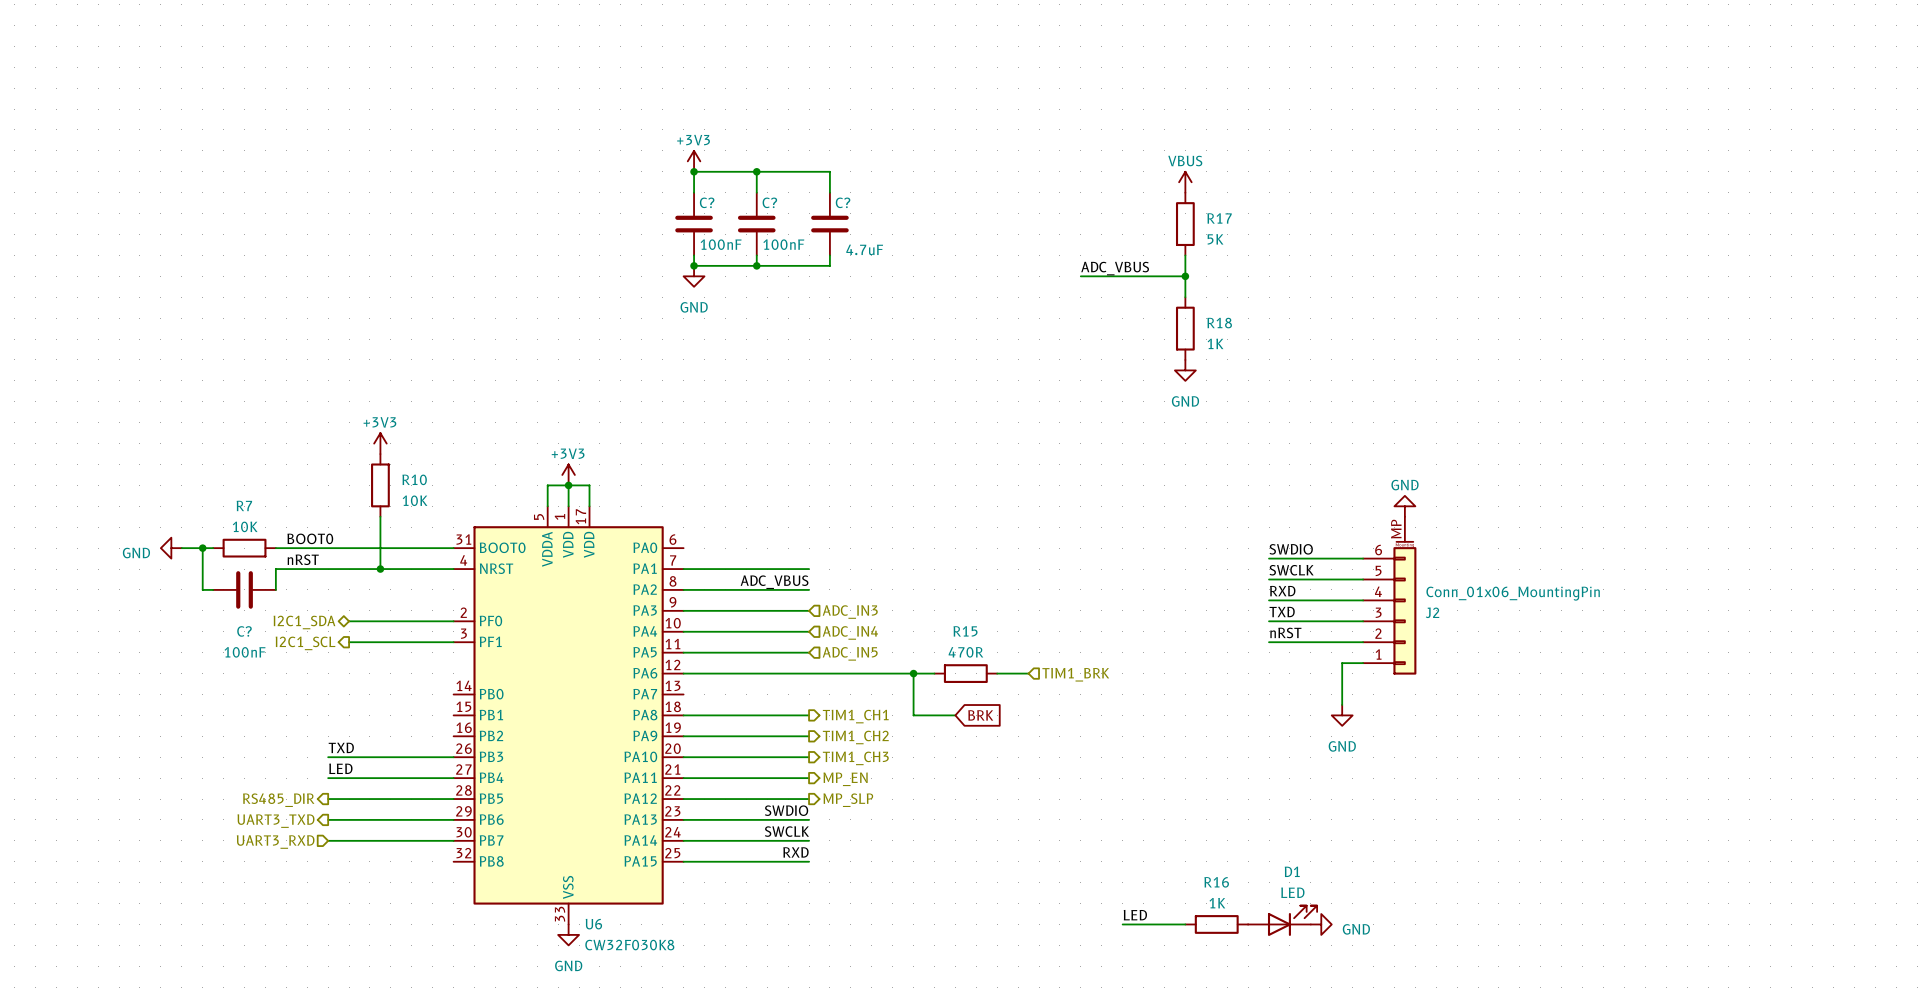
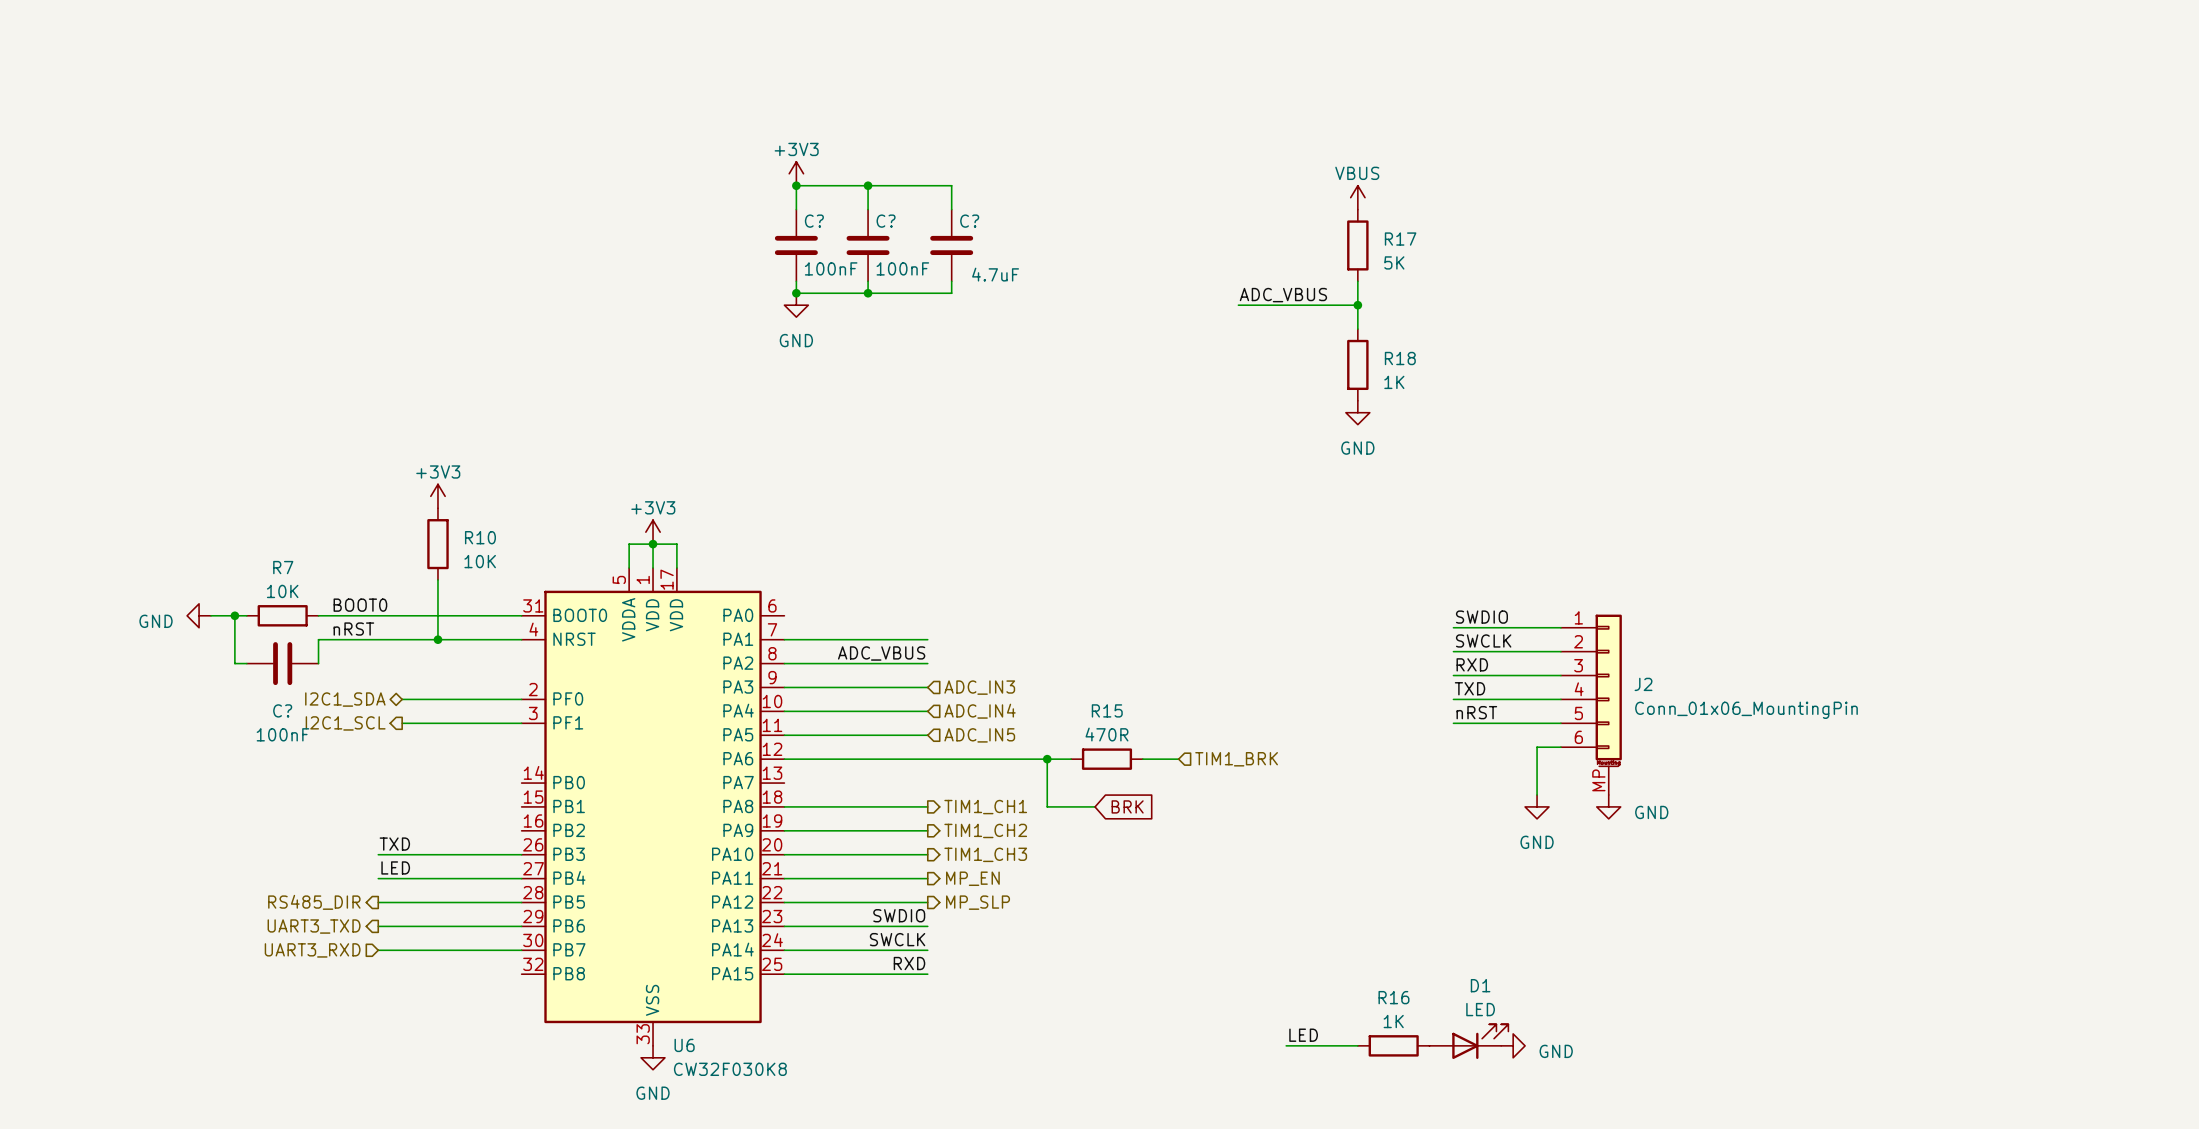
power symbol: GND (1404, 506) -> none
J2 flip: as is (1404, 607) -> up-down (1608, 690)
power symbol: none -> GND (1608, 806)

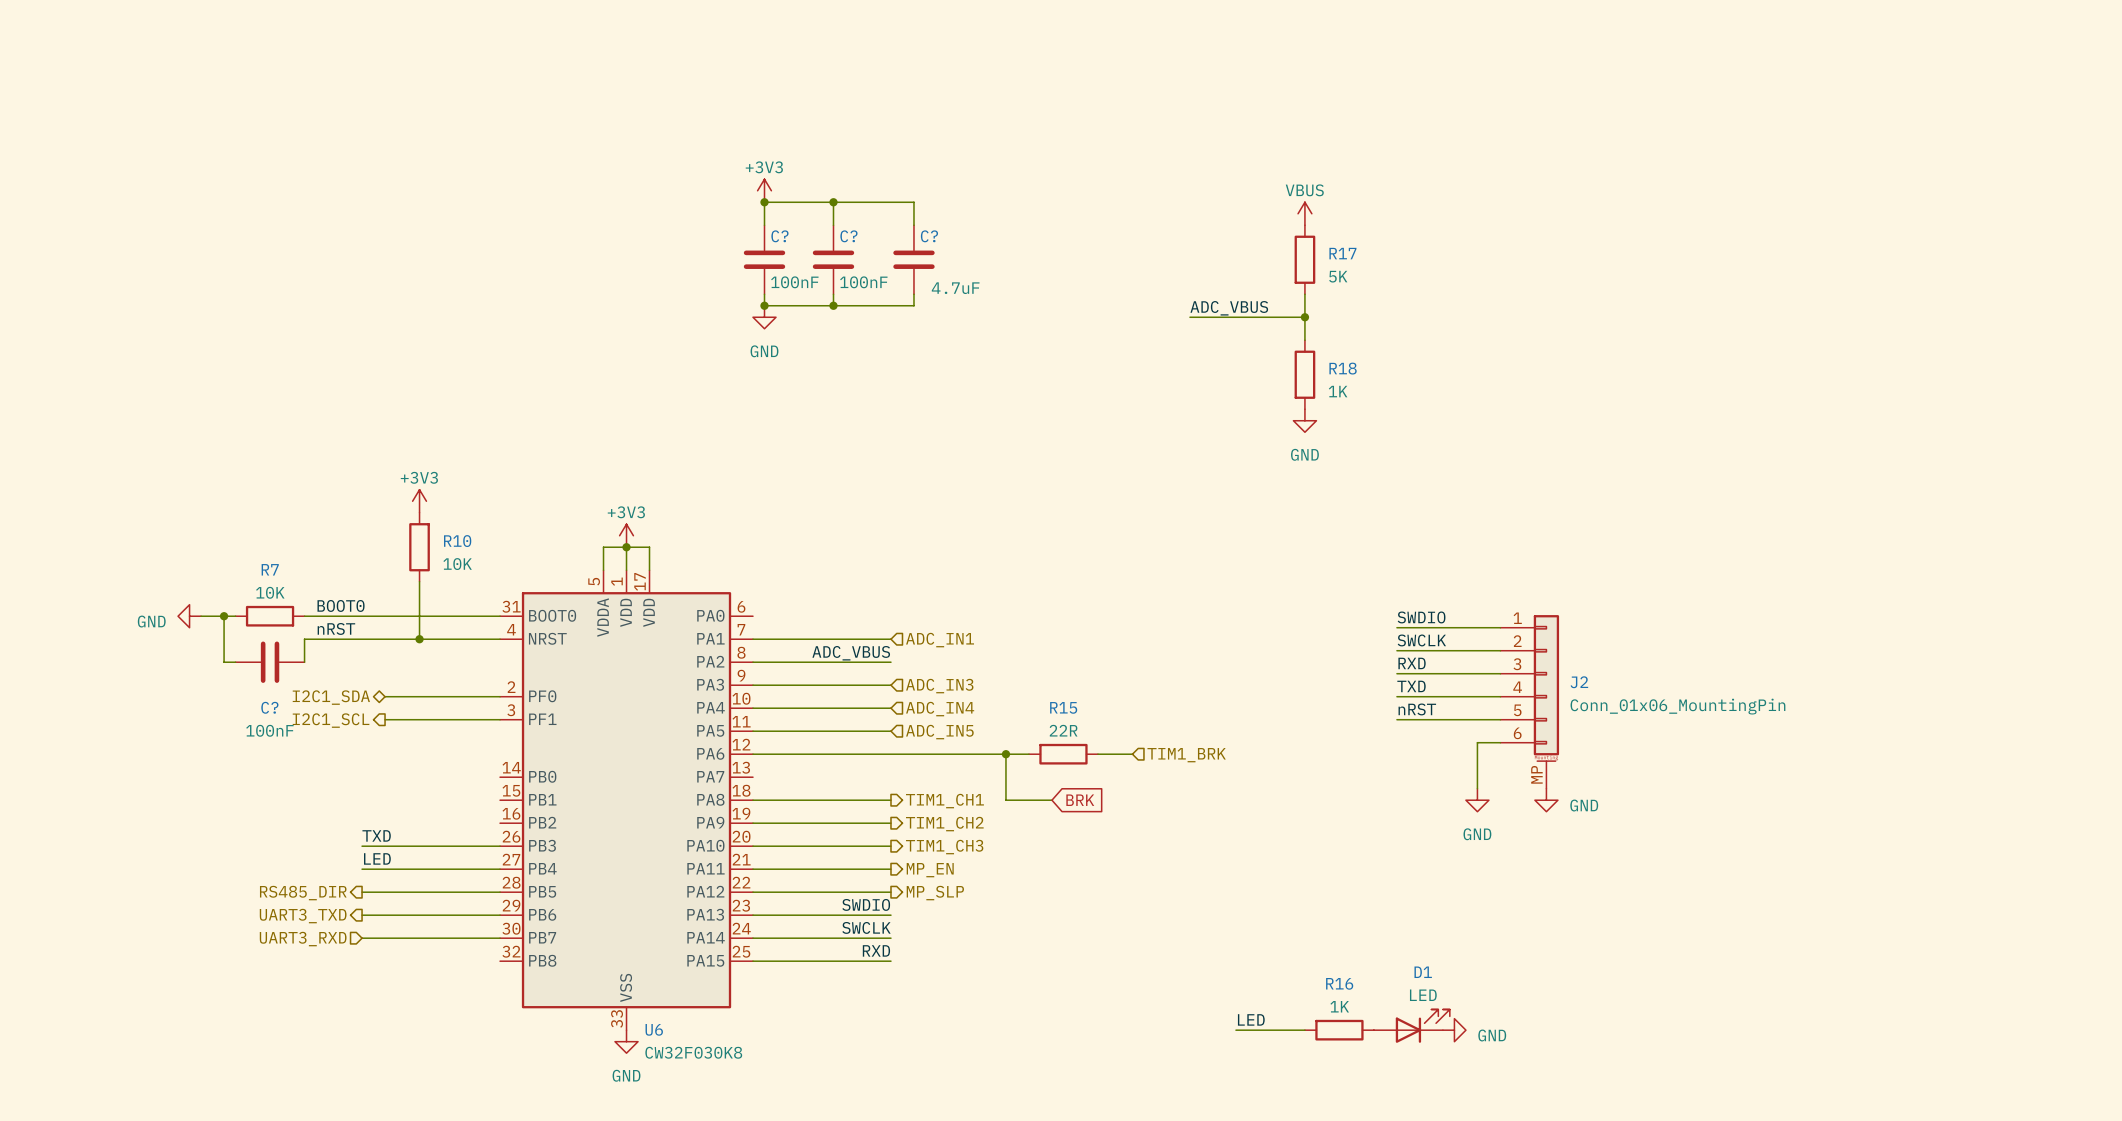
hierarchical label: none -> ADC_IN1 (940, 640)
R15 value: 470R (1106, 734) -> 22R (1063, 730)

